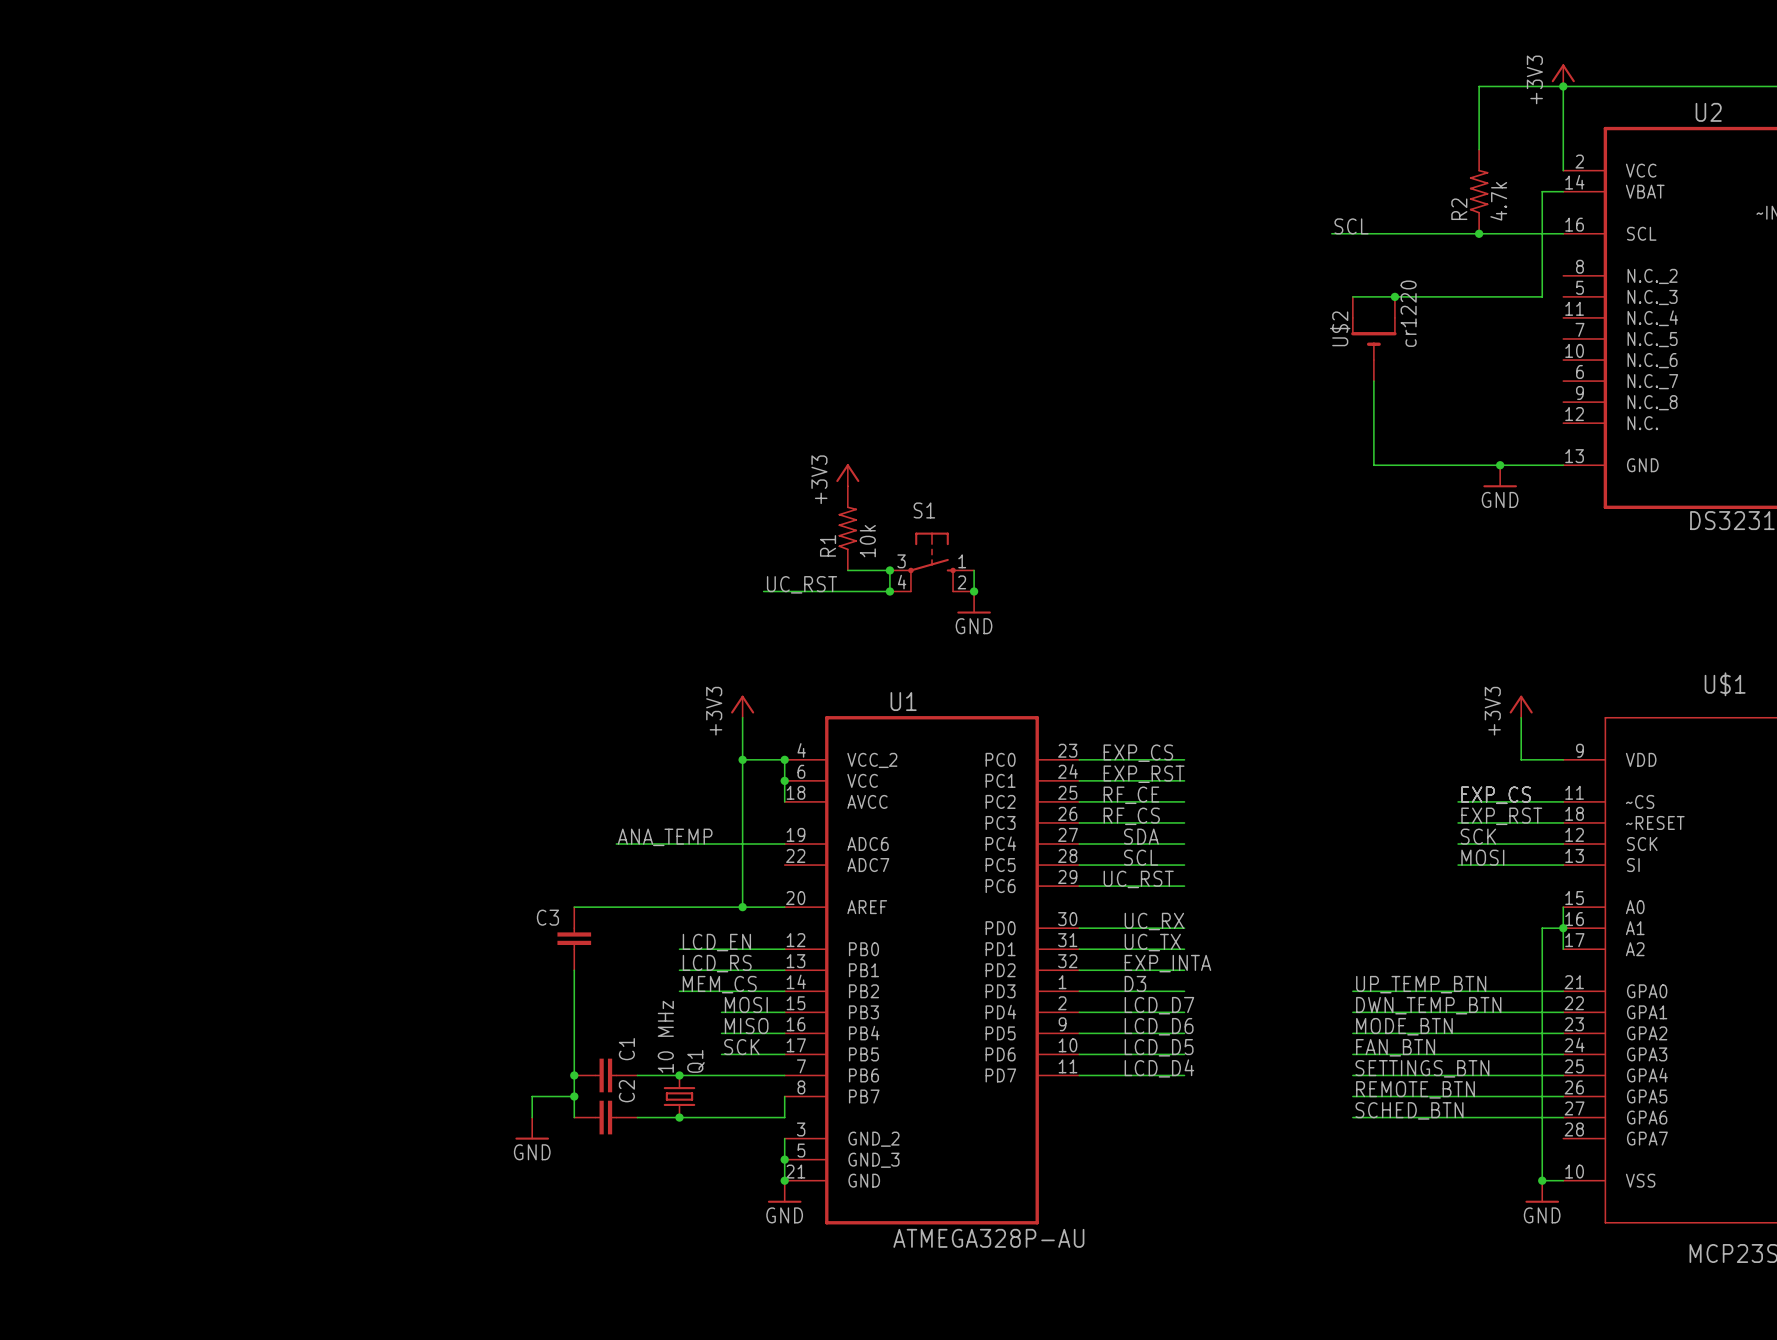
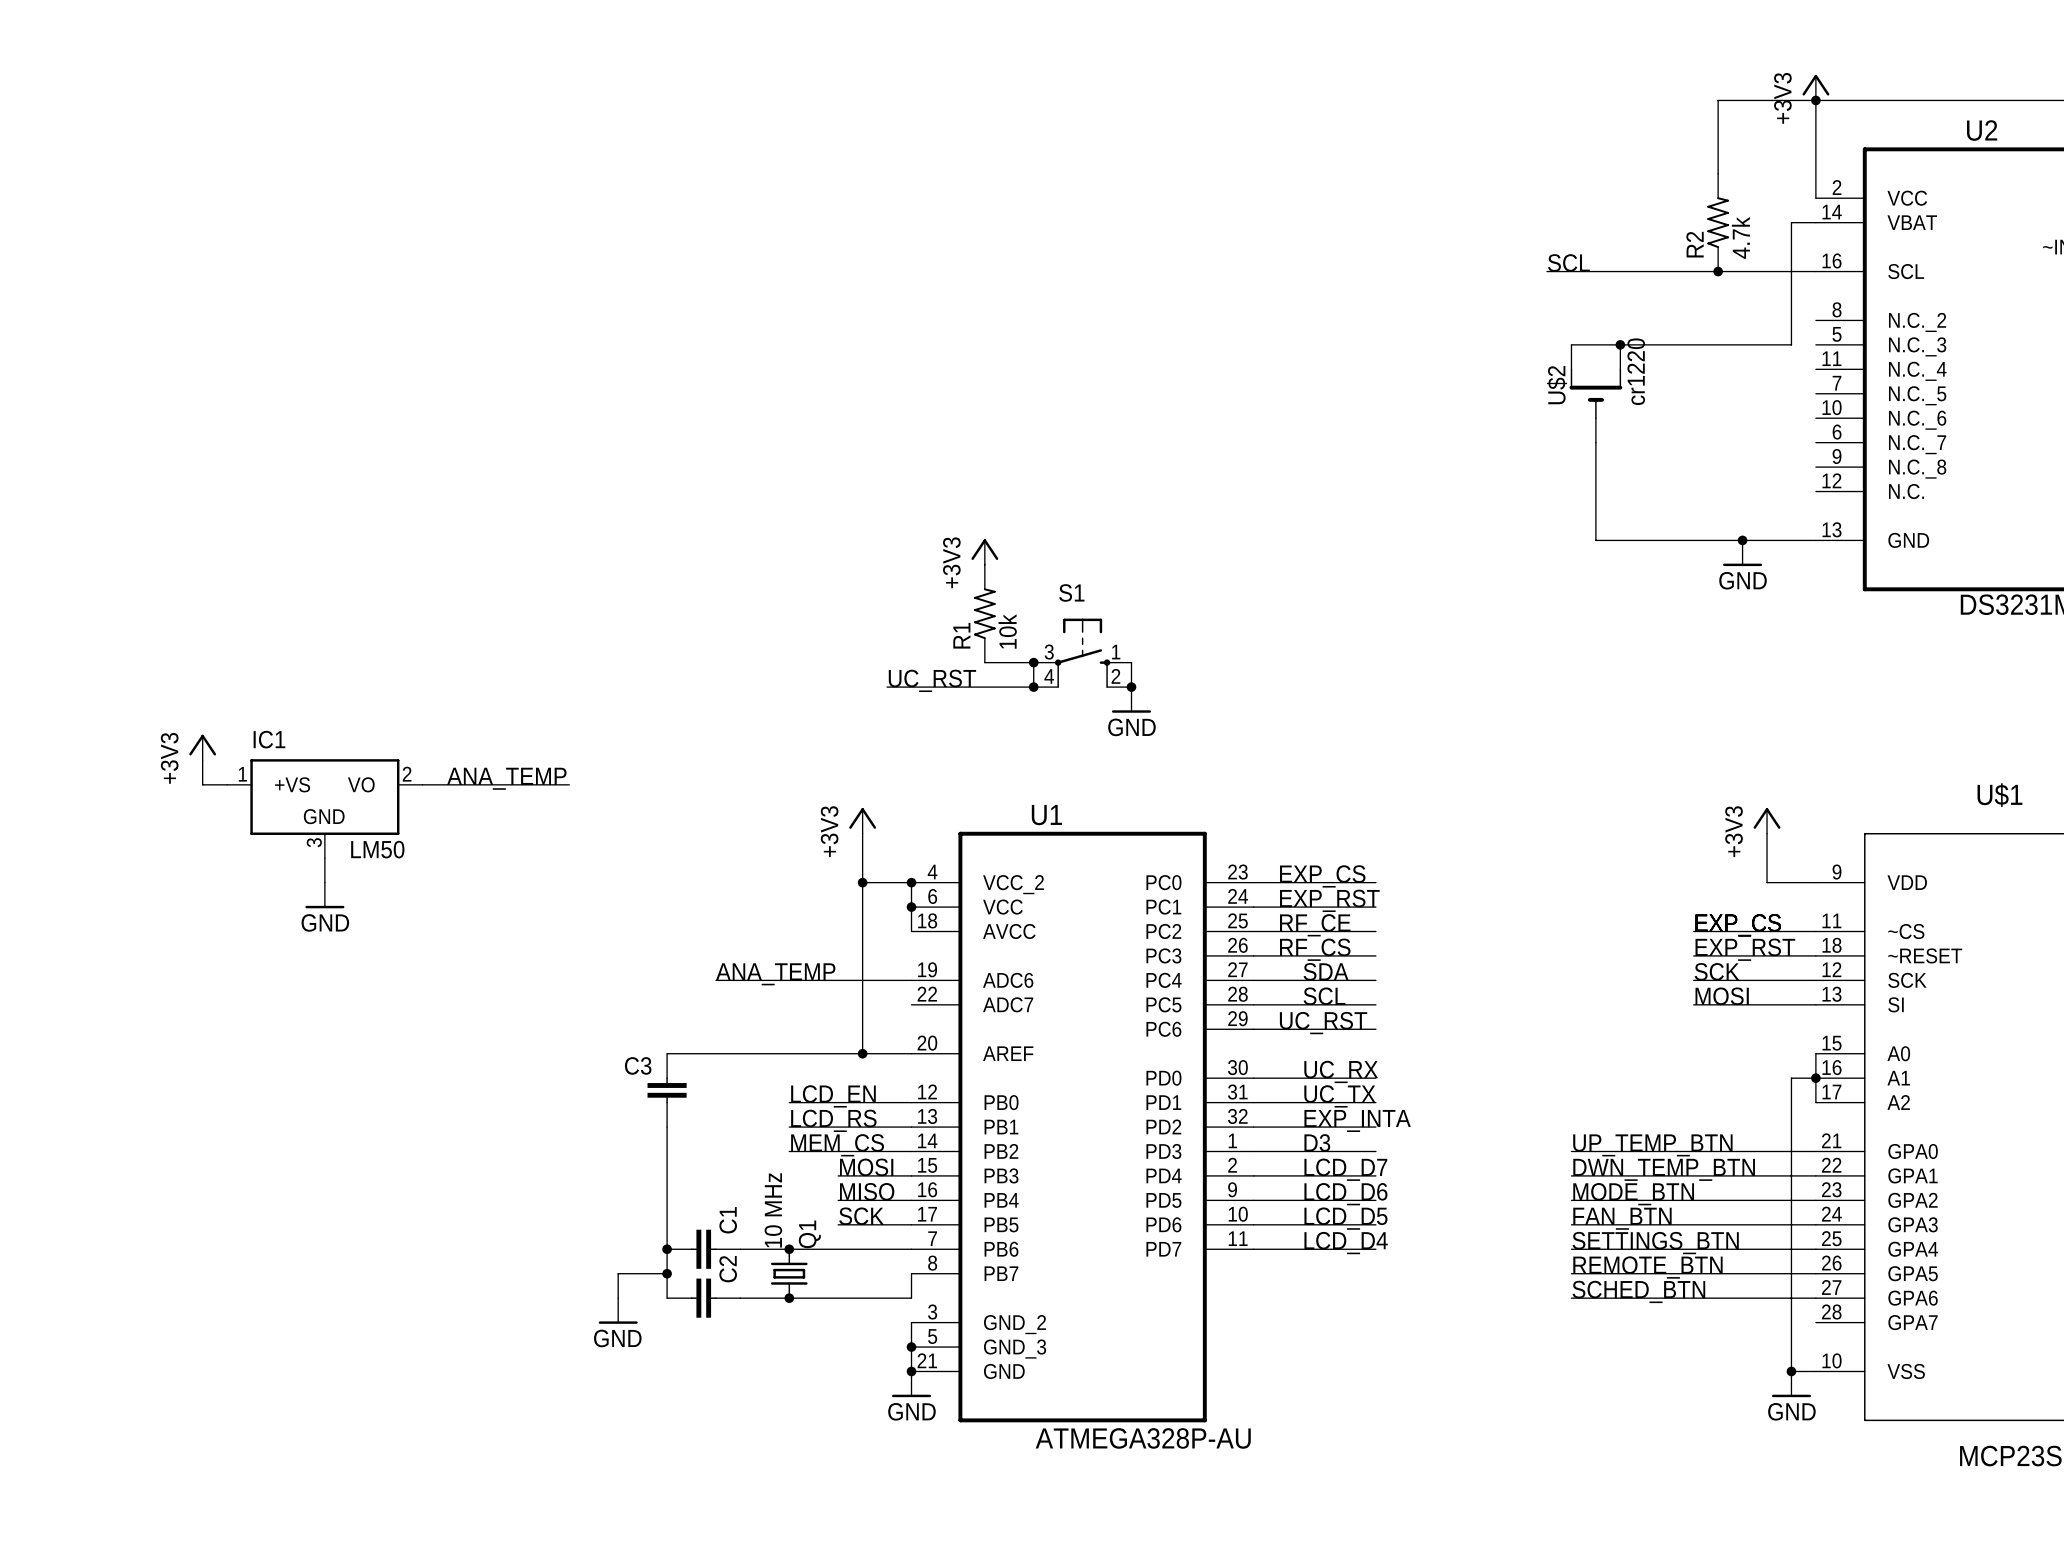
power symbol: none -> +3V3 (202, 747)
wire: none -> (202, 760) (202, 784) (227, 784)
label: none -> ANA_TEMP (506, 778)
wire: none -> (422, 784) (569, 784)
IC1: none -> LM50 (324, 808)
wire: none -> (324, 858) (324, 882)
power symbol: none -> GND (324, 895)

